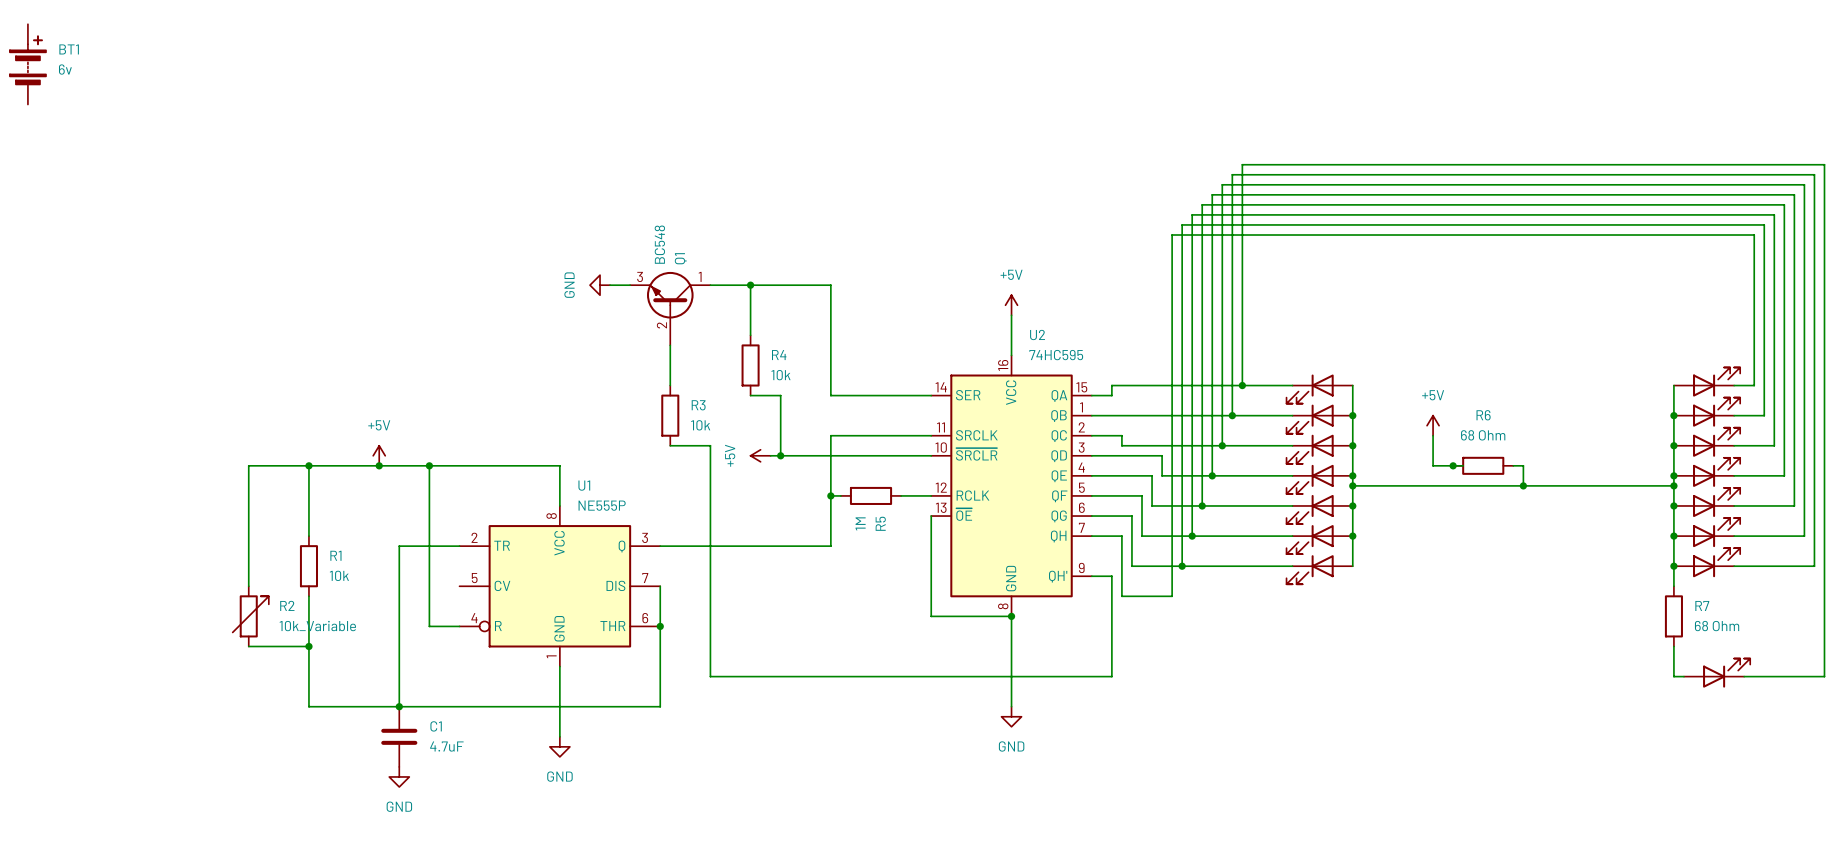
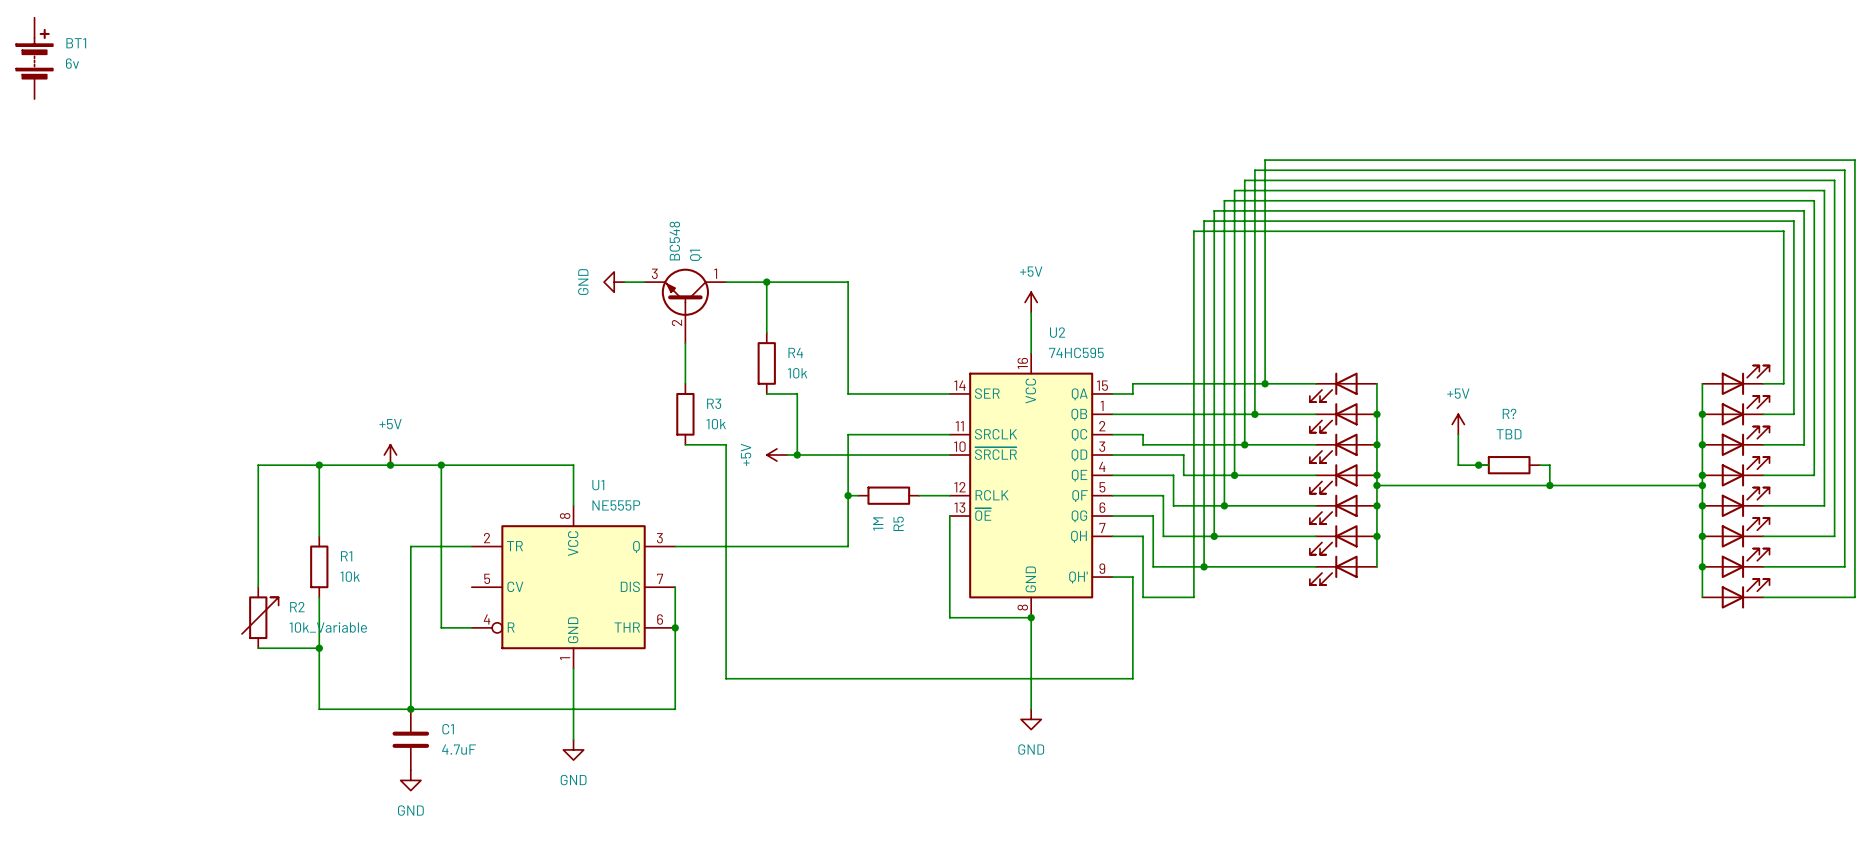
R6 name: R6 (1483, 415) -> R? (1509, 413)
R6 value: 68 Ohm (1483, 435) -> TBD (1509, 434)
wire: (1824, 596) (1824, 676) (1744, 676) -> (1854, 597) (1763, 597)
R7: 68 Ohm (1673, 616) -> none
wire: (1673, 646) (1673, 676) (1683, 676) -> none
part position: (1717, 673) -> (1735, 593)

